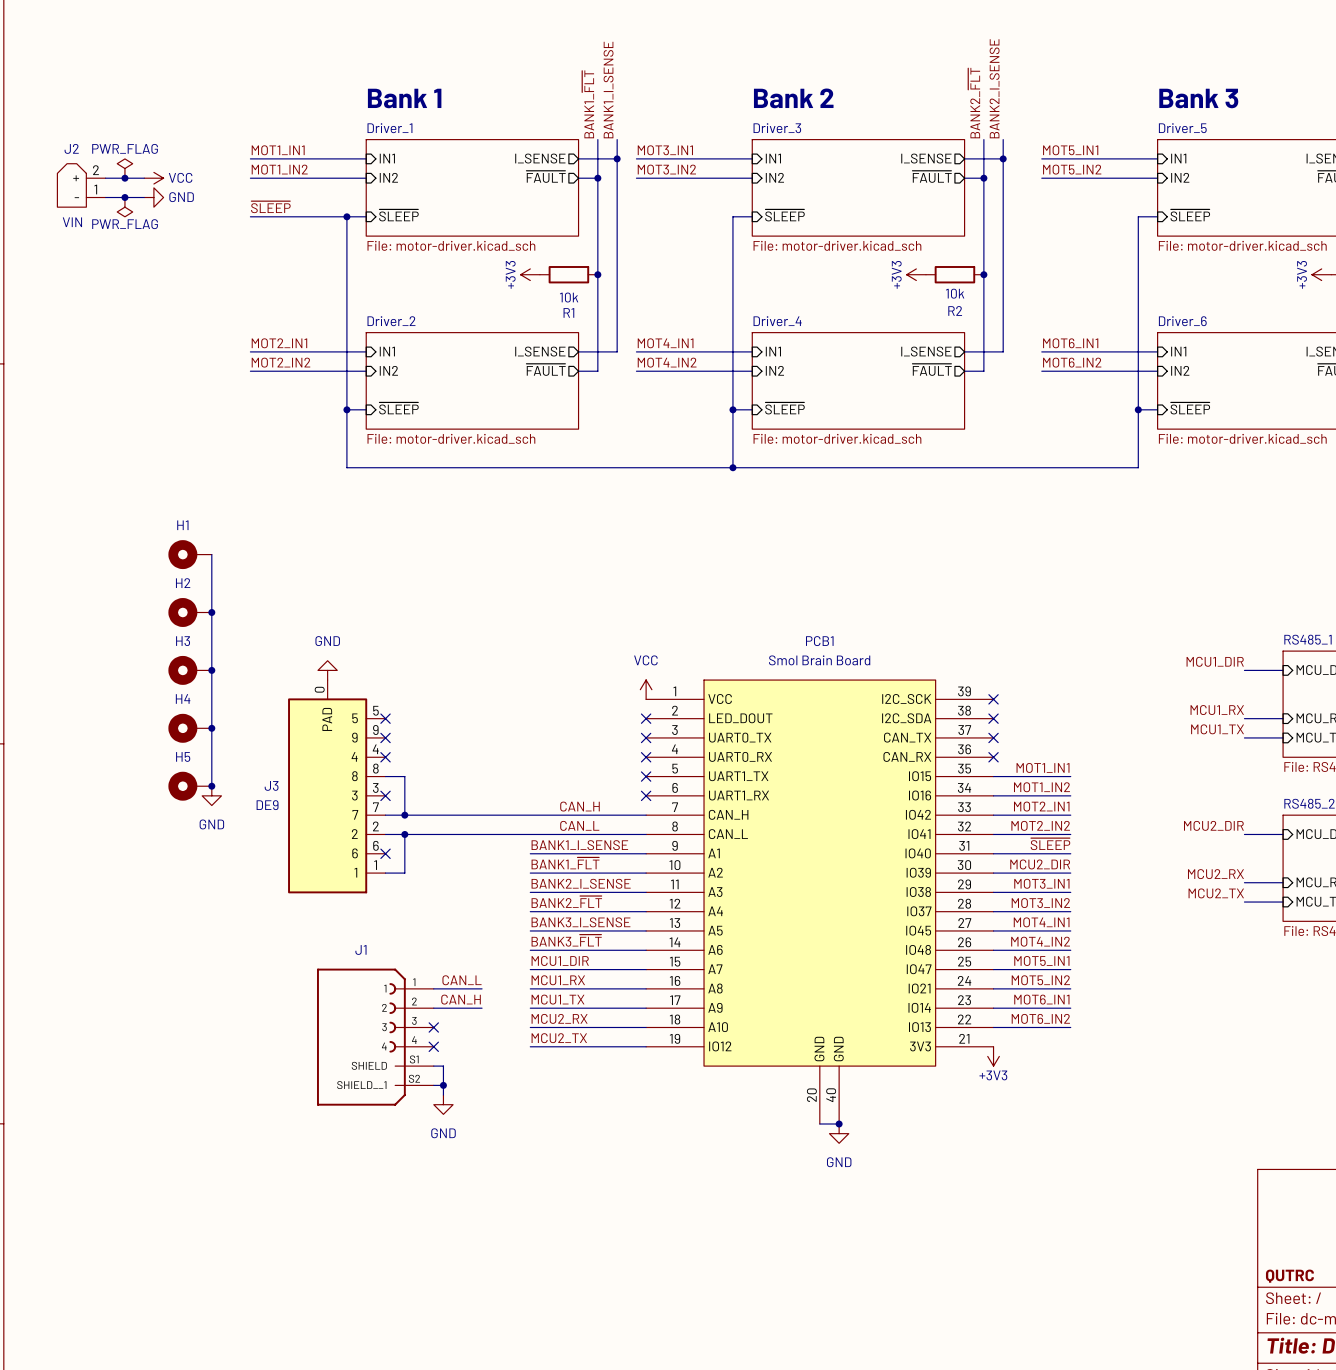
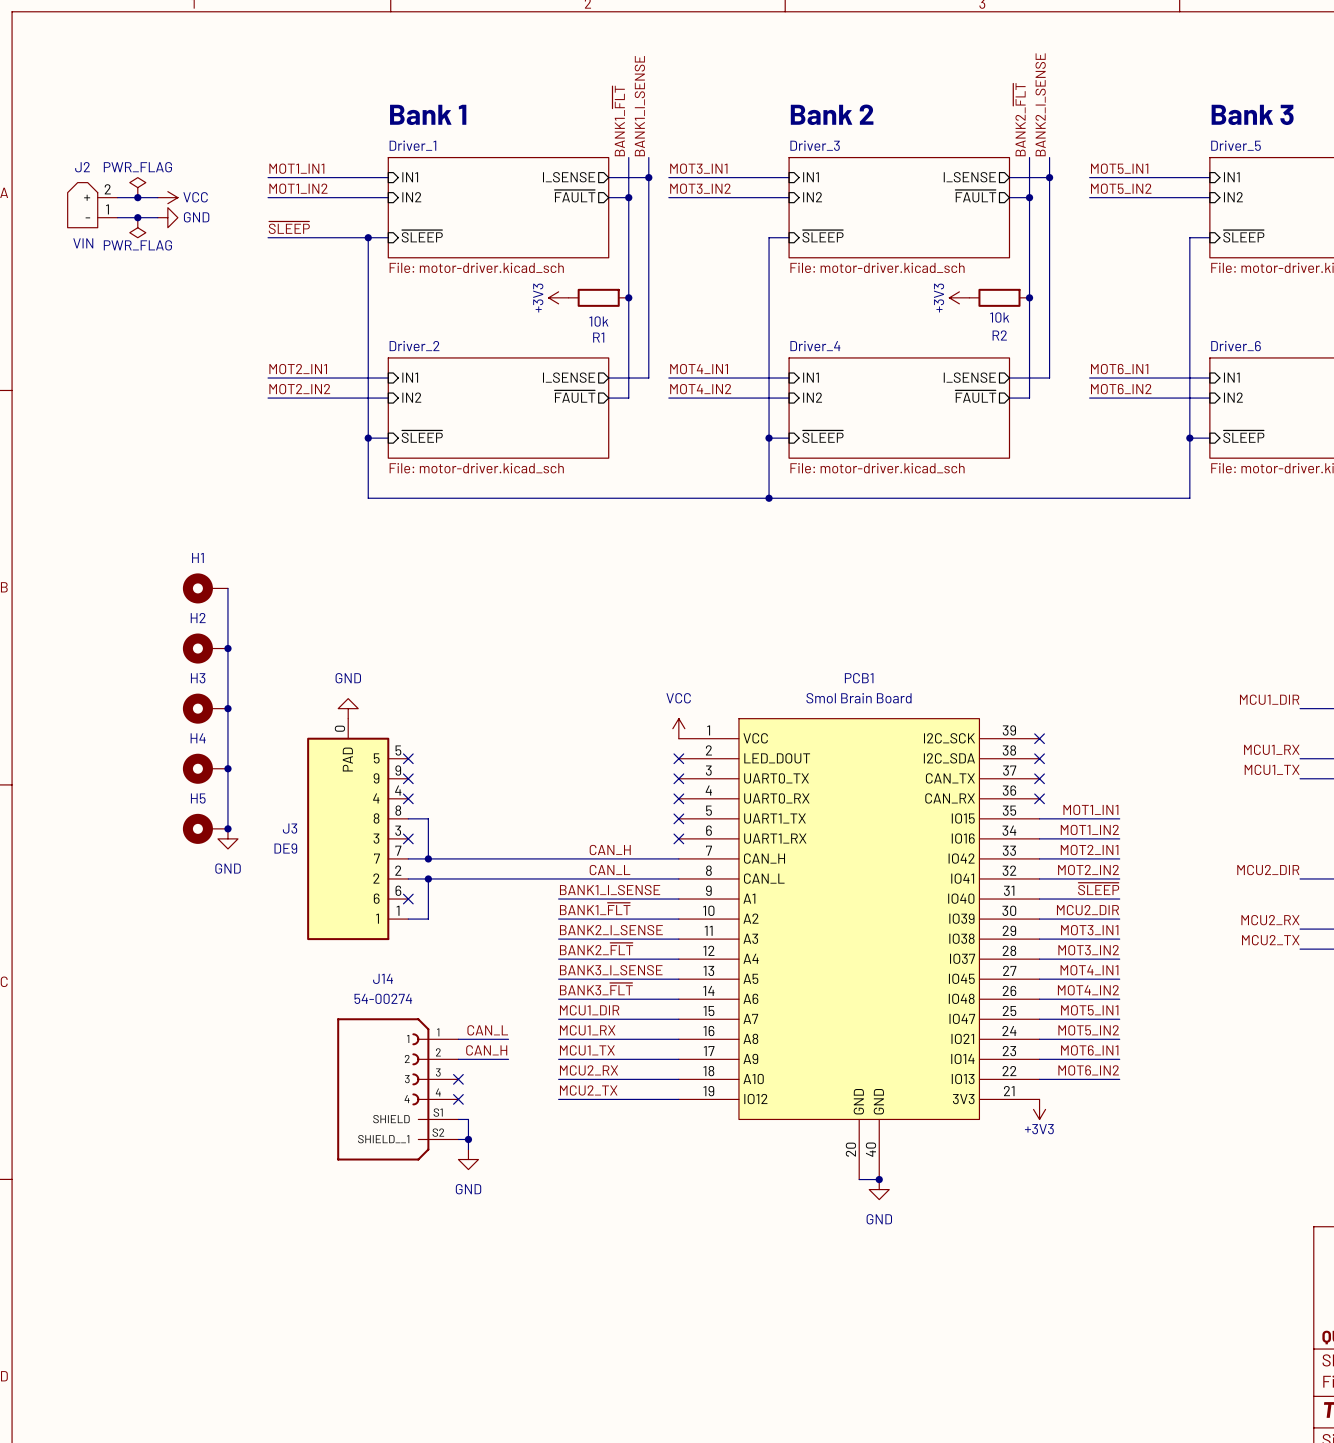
J1 name: J1 (360, 949) -> J14 (383, 978)
J1 value: none -> 54-00274 (383, 998)

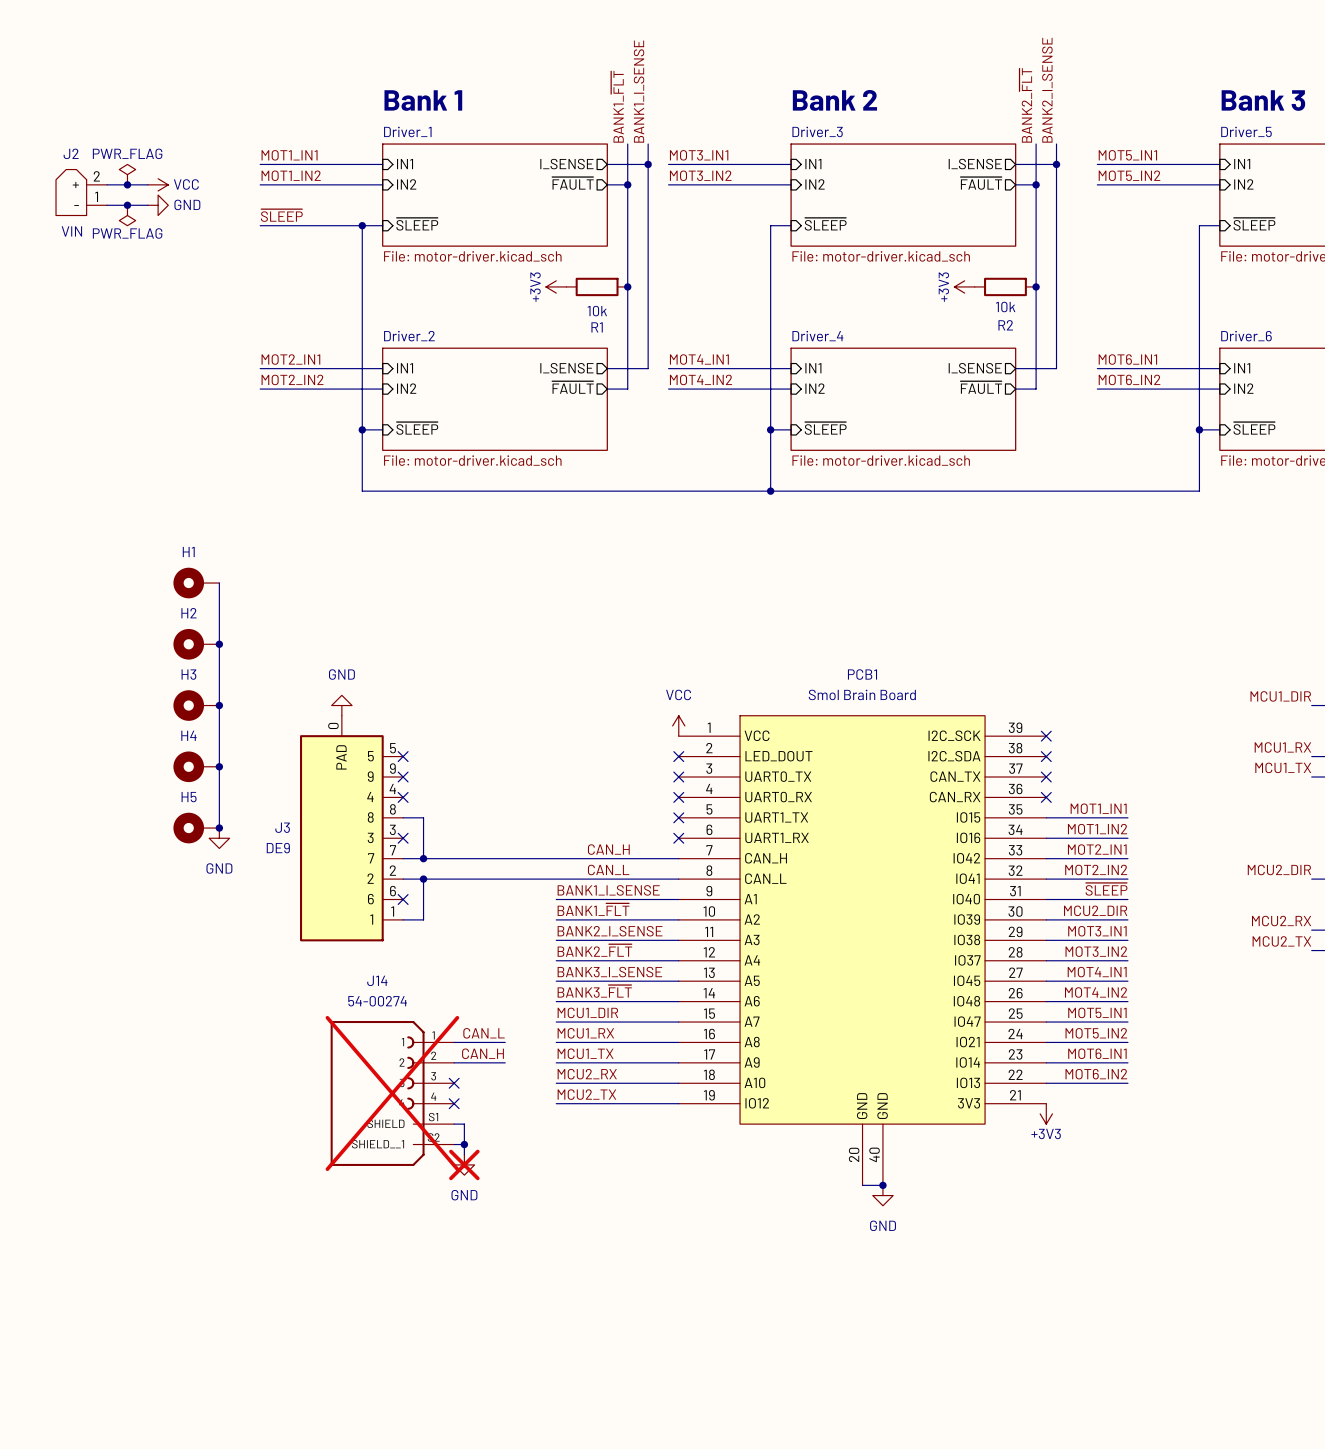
J14 do-not-place cross: none -> (392, 1093)
power symbol do-not-place cross: none -> (464, 1164)

